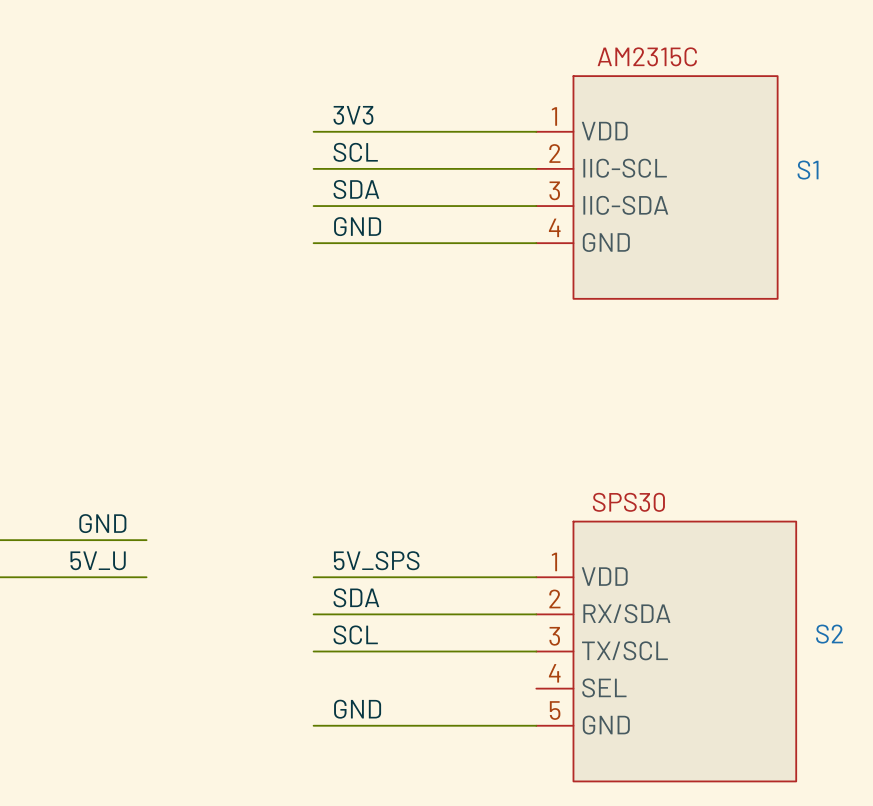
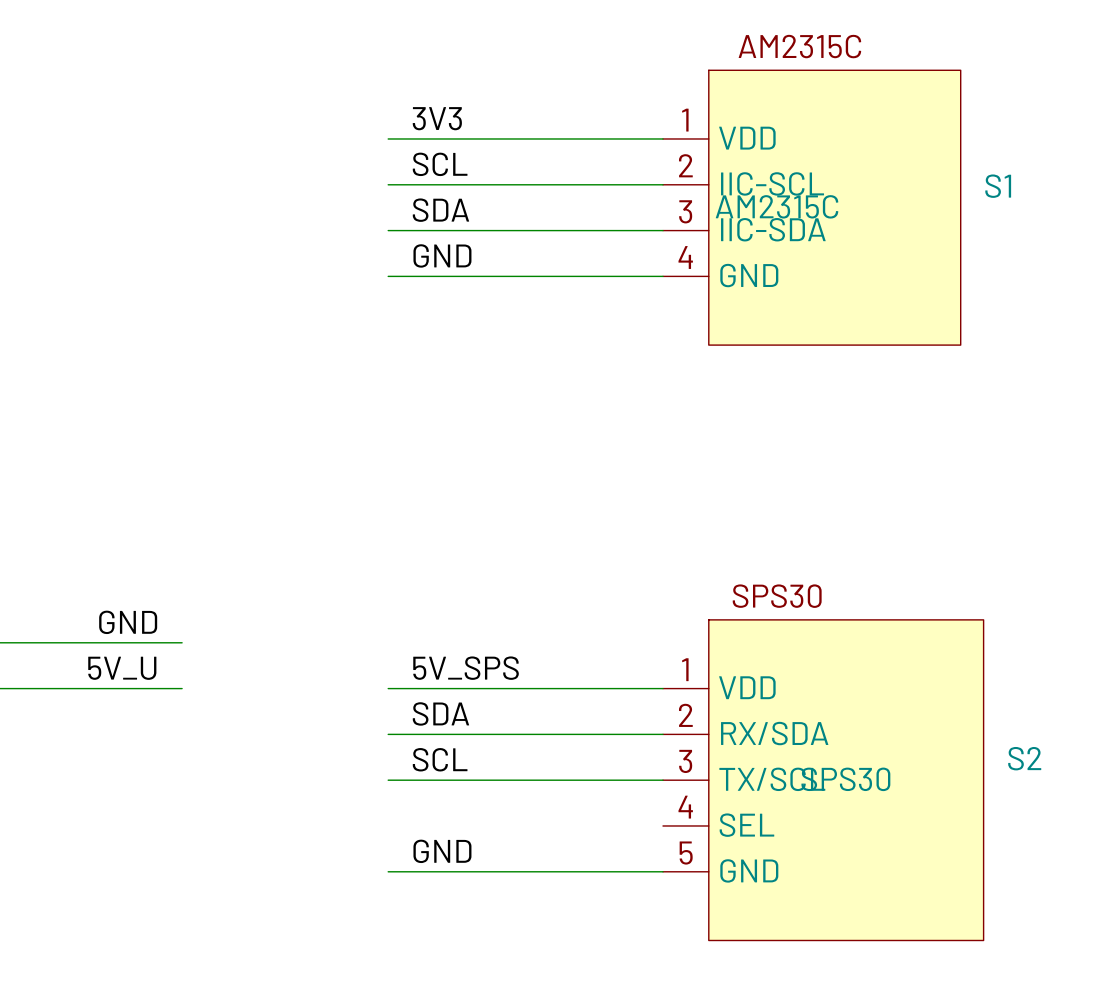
S1 value: none -> AM2315C (776, 206)
S2 value: none -> SPS30 (845, 779)

